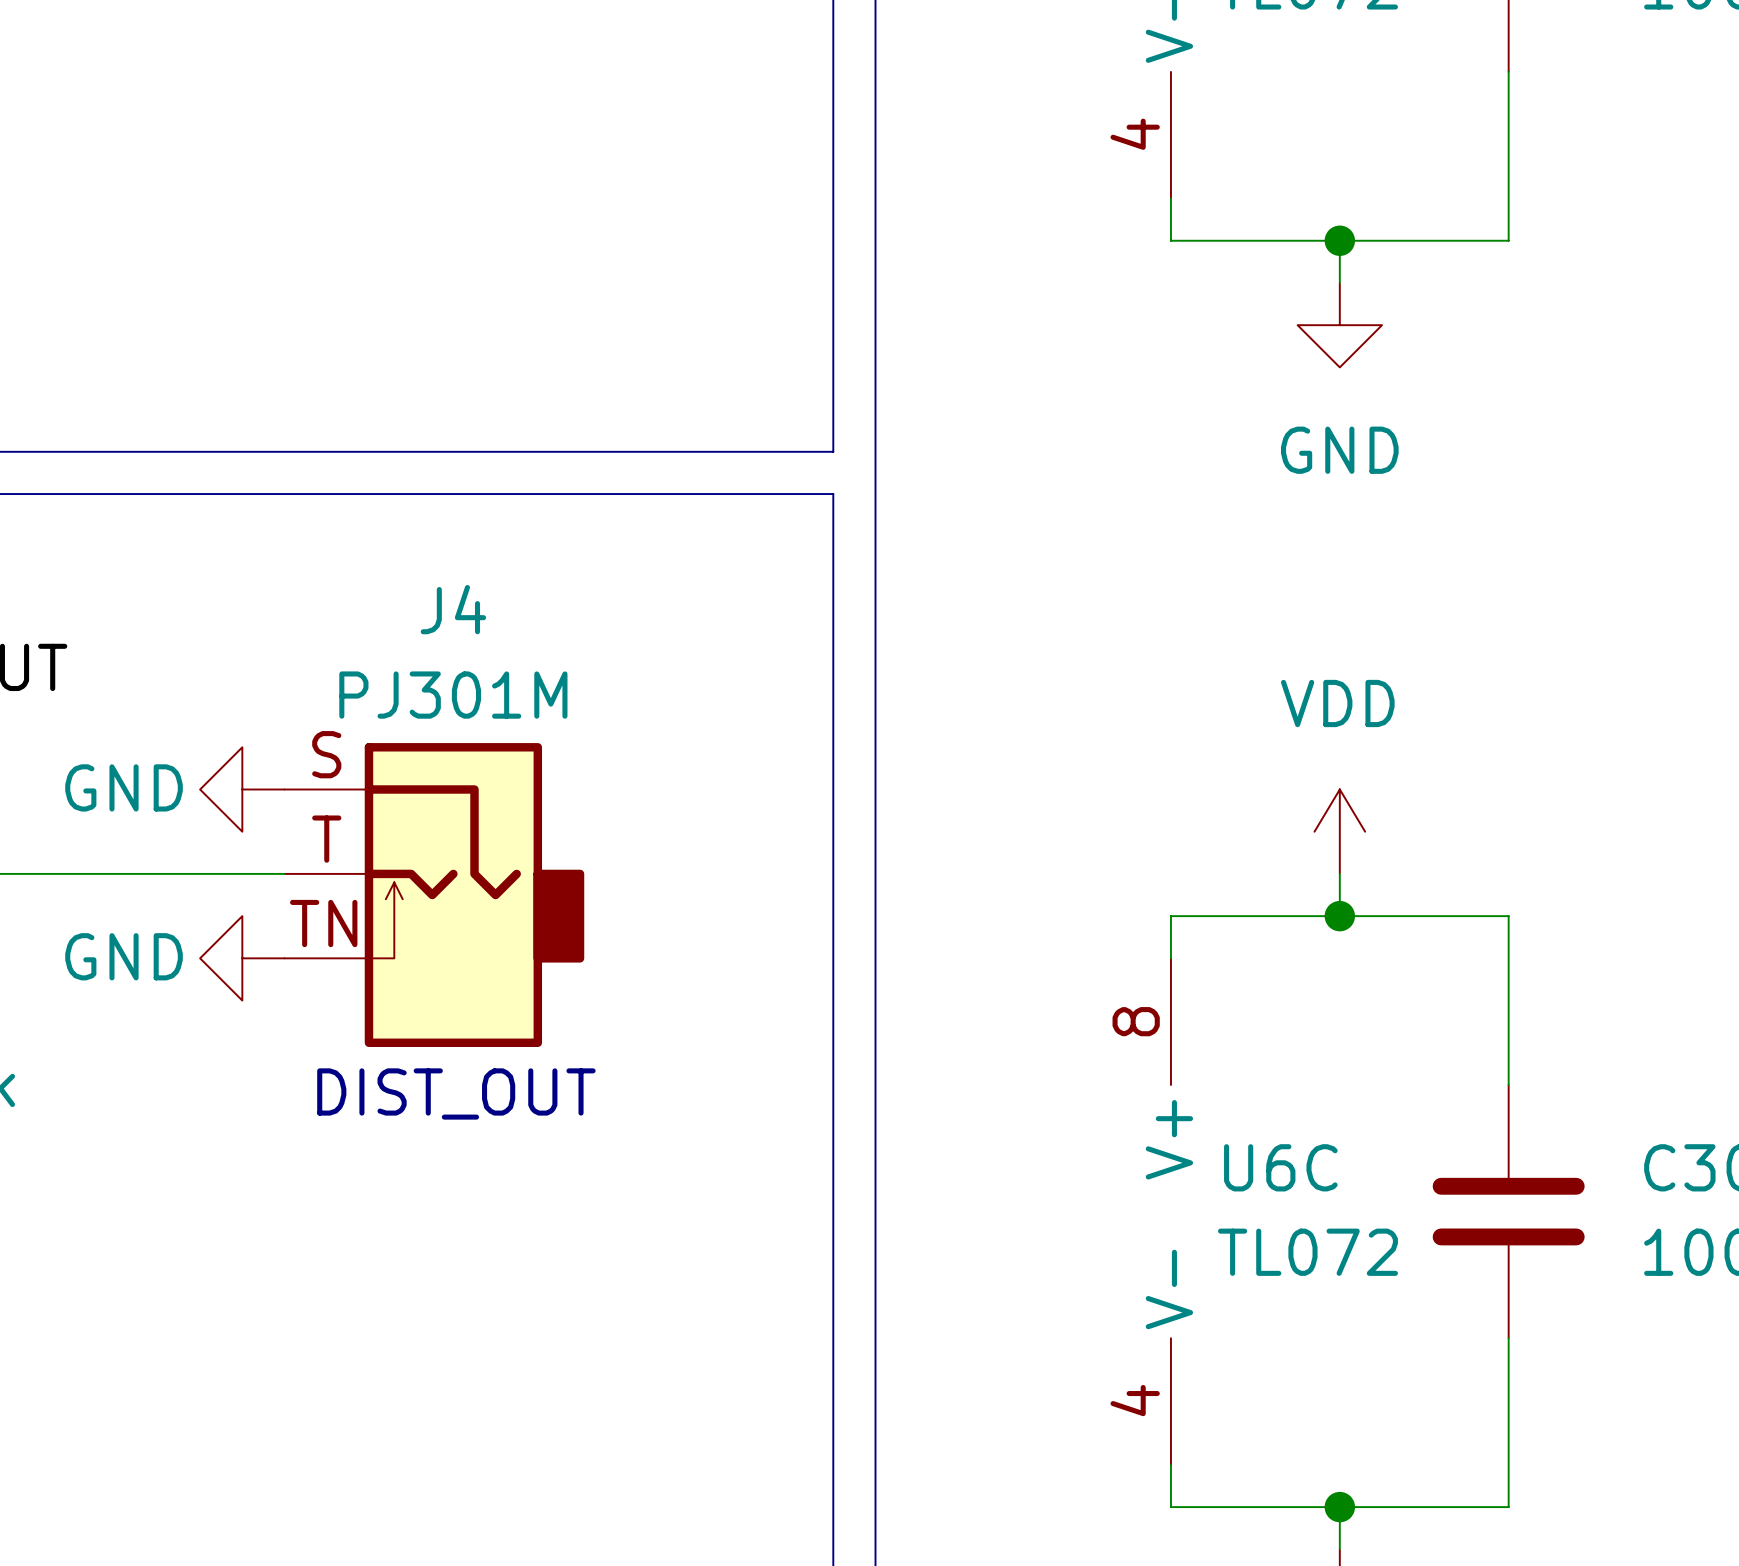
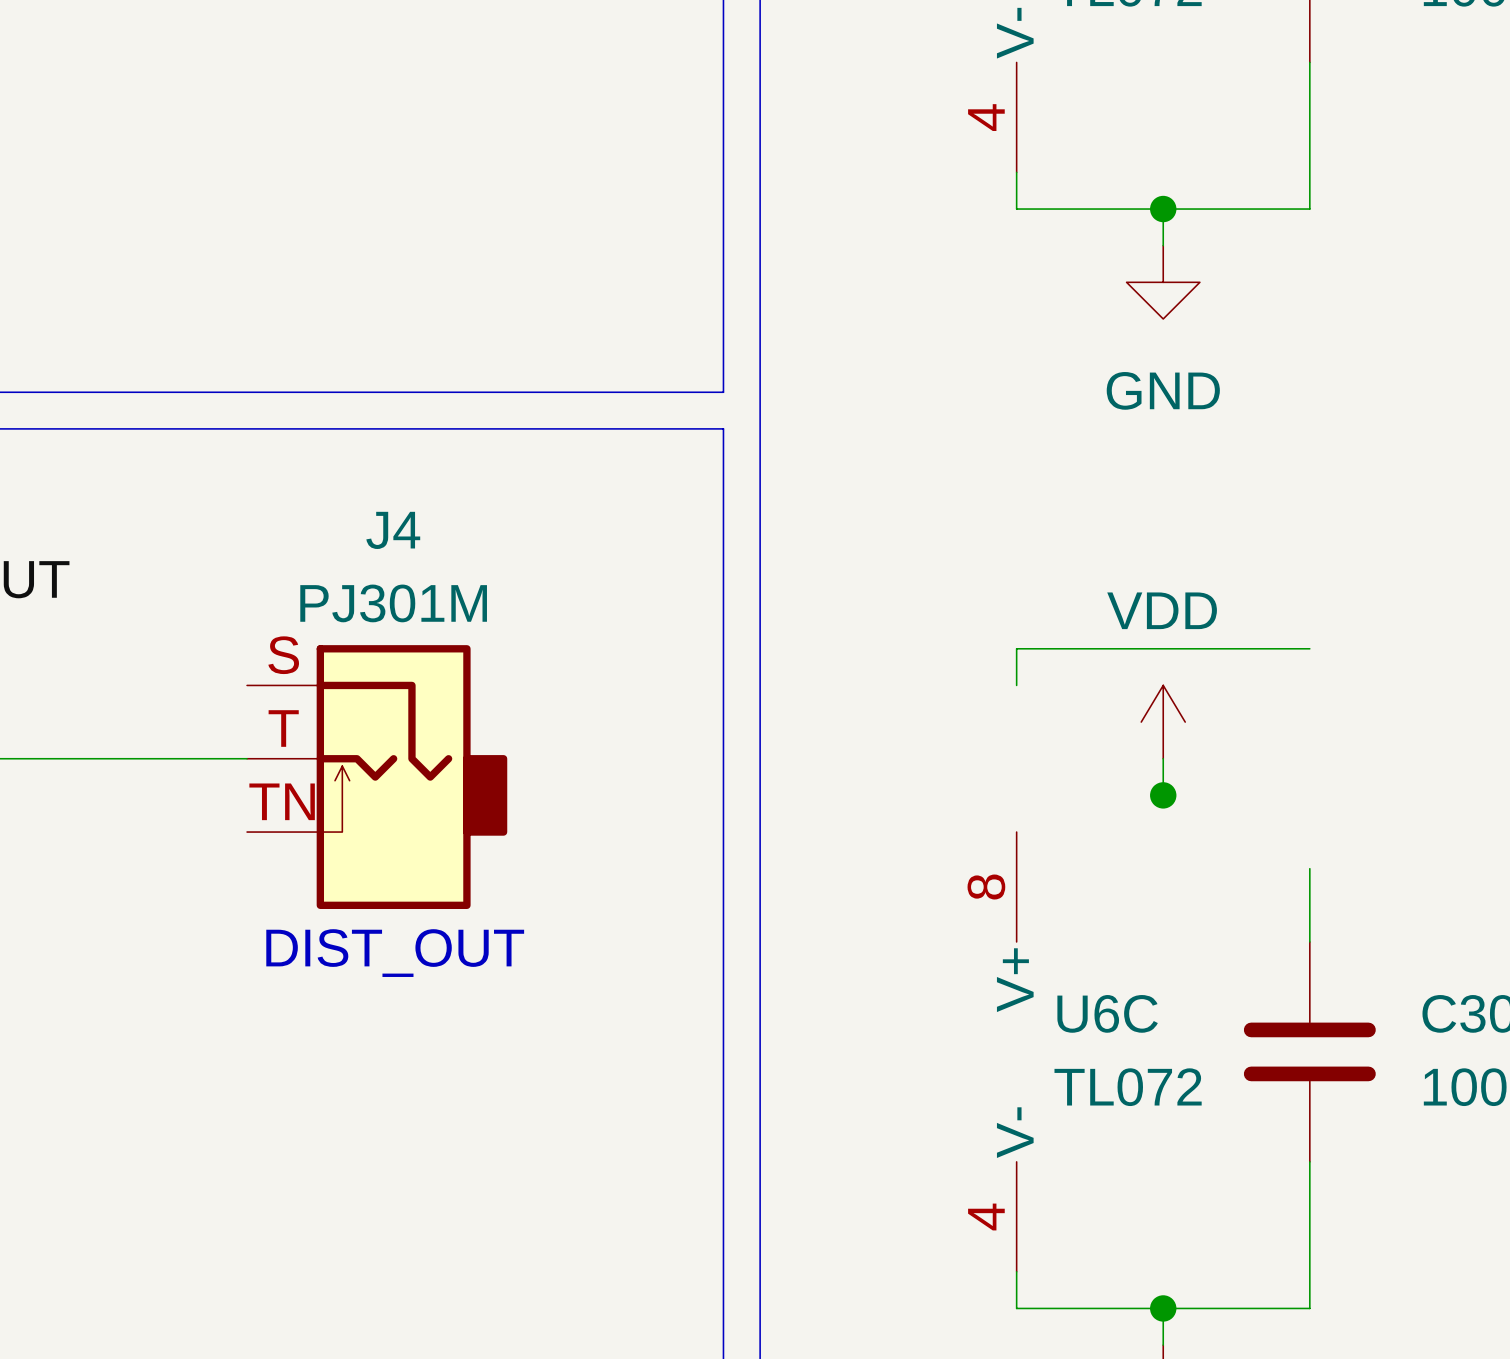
wire: none -> (1309, 648) (1016, 648) (1016, 685)
power symbol: GND (242, 789) -> none
power symbol: GND (242, 958) -> none
wire: (1170, 958) (1170, 916) (1508, 916) (1508, 1000) -> none

